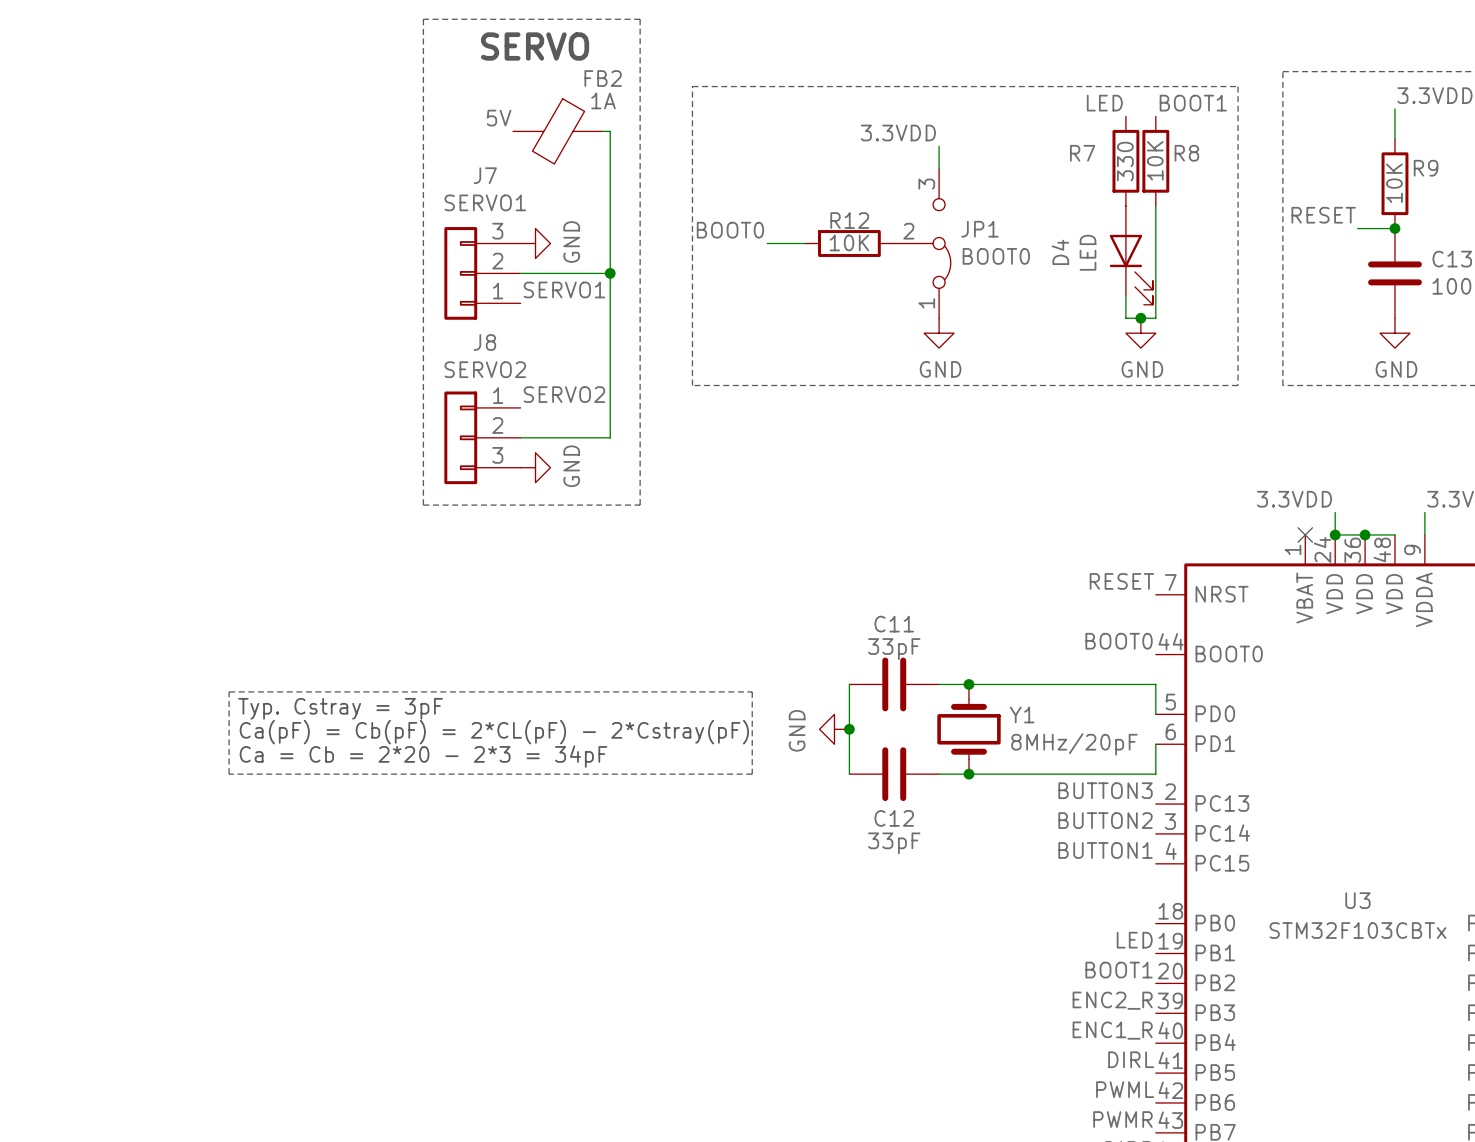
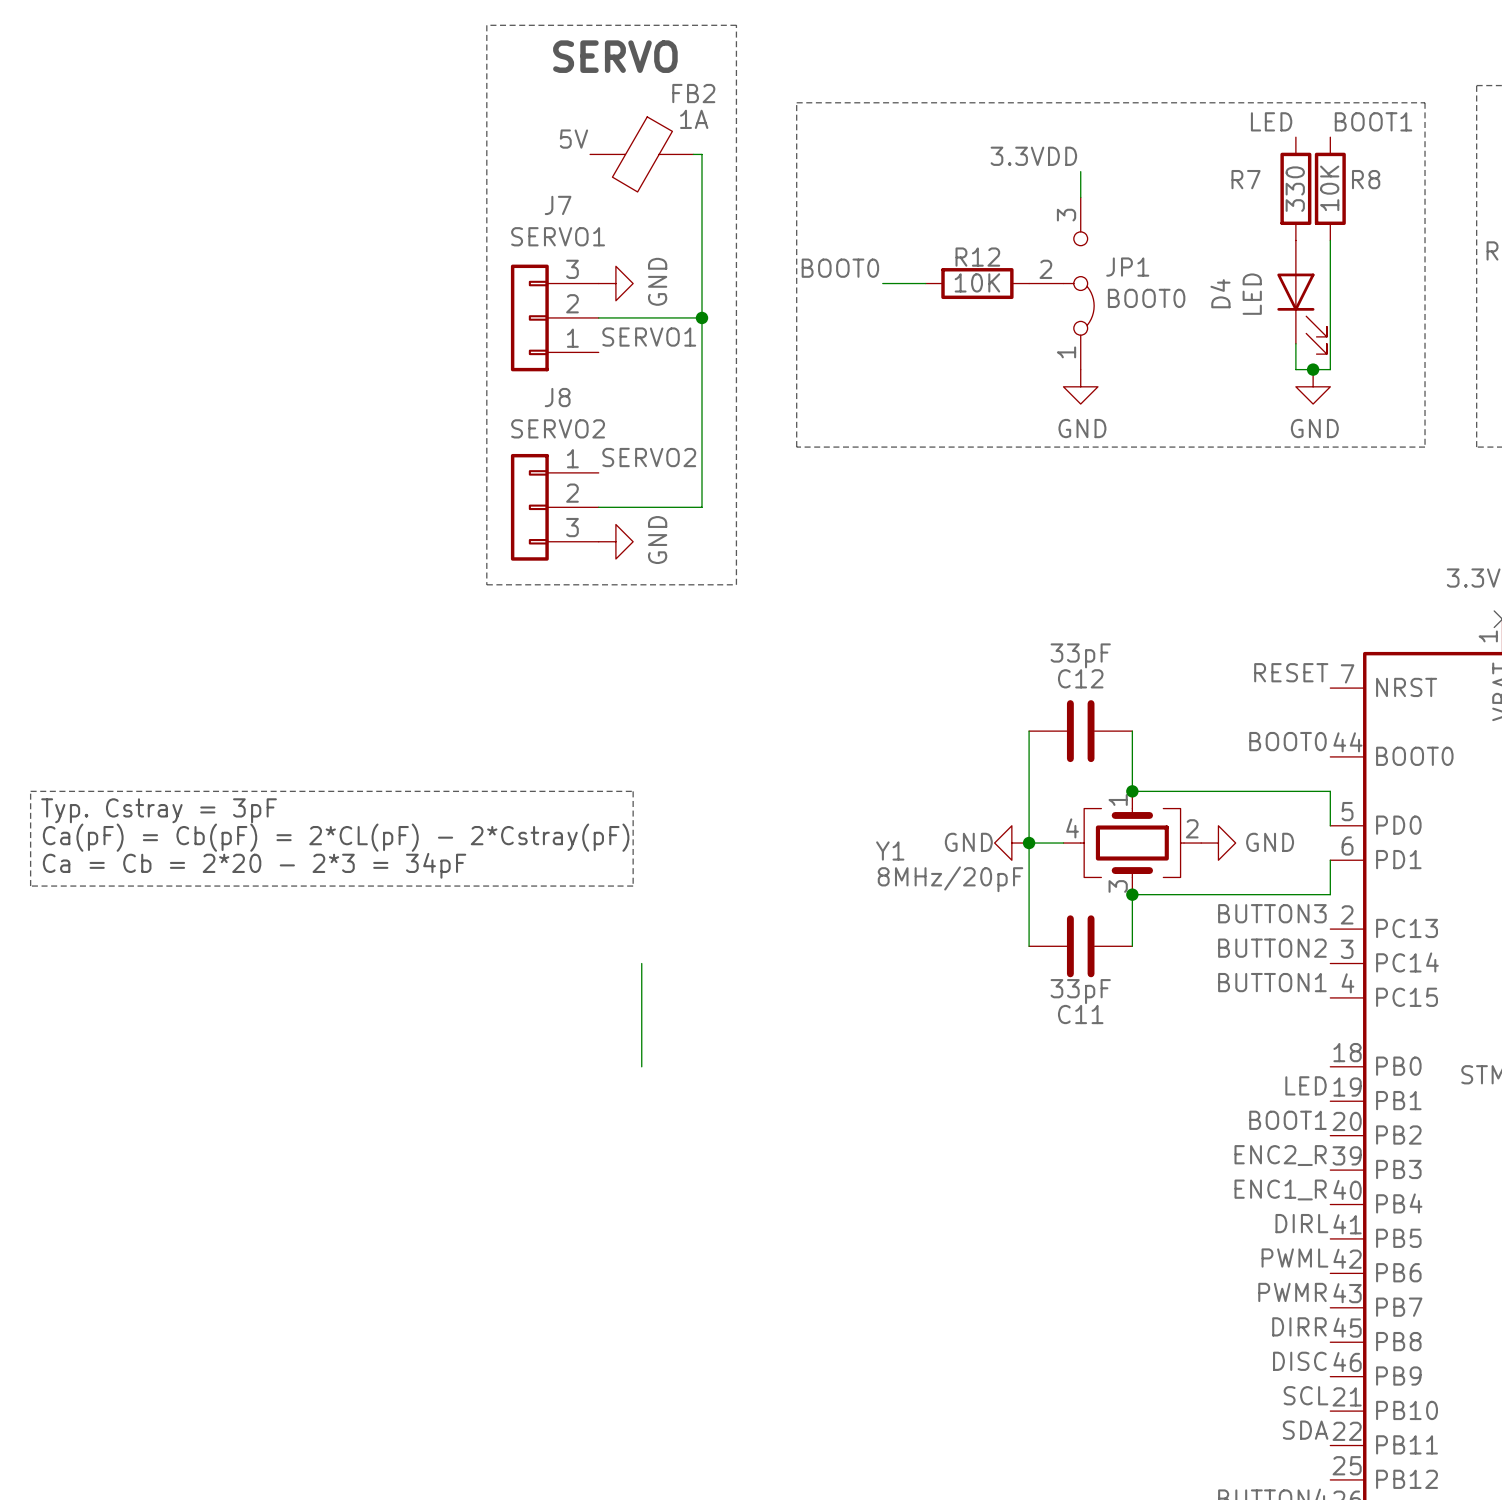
C11 name position: C11 (894, 624) -> C11 (1080, 1014)
wire: none -> (1029, 731) (1029, 946)
C11 value position: 33pF (894, 649) -> 33pF (1080, 991)
wire: (849, 684) (849, 774) -> none
C11 position: (894, 684) -> (1080, 946)
Y1 symbol: [937, 684, 1001, 775] -> [1063, 791, 1202, 895]
wire: (939, 684) (983, 684) -> (1132, 731) (1132, 791)
junction position: (968, 684) -> (1132, 791)
line: (229, 691) (752, 691) (752, 774) (229, 774) (229, 691) -> (30, 791) (633, 791) (633, 886) (30, 886) (30, 791)
text position: Typ. Cstray = 3pF (340, 708) -> Typ. Cstray = 3pF (159, 810)
Y1 name position: Y1 (1022, 714) -> Y1 (890, 850)
power symbol position: GND (834, 729) -> GND (1011, 843)
junction: (849, 729) -> none
wire: none -> (1029, 843) (1063, 843)
junction: none -> (1029, 843)
power symbol: none -> GND (1218, 843)
power symbol text rotation: 0° (797, 730) -> 90° clockwise (968, 842)
text position: Ca(pF) = Cb(pF) = 2*CL(pF) - 2*Cstray(pF) (494, 732) -> Ca(pF) = Cb(pF) = 2*CL(pF) - 2*Cstray(pF) (336, 837)
Y1 value position: 8MHz/20pF (1074, 744) -> 8MHz/20pF (950, 879)
text position: Ca = Cb = 2*20 - 2*3 = 34pF (423, 756) -> Ca = Cb = 2*20 - 2*3 = 34pF (254, 865)
C12 position: (894, 774) -> (1080, 731)
wire: (939, 774) (983, 774) -> (1132, 946) (1132, 894)
junction position: (968, 774) -> (1132, 894)
C12 name position: C12 (894, 818) -> C12 (1080, 678)
wire: none -> (641, 963) (641, 1066)
C12 value position: 33pF (894, 843) -> 33pF (1080, 655)

